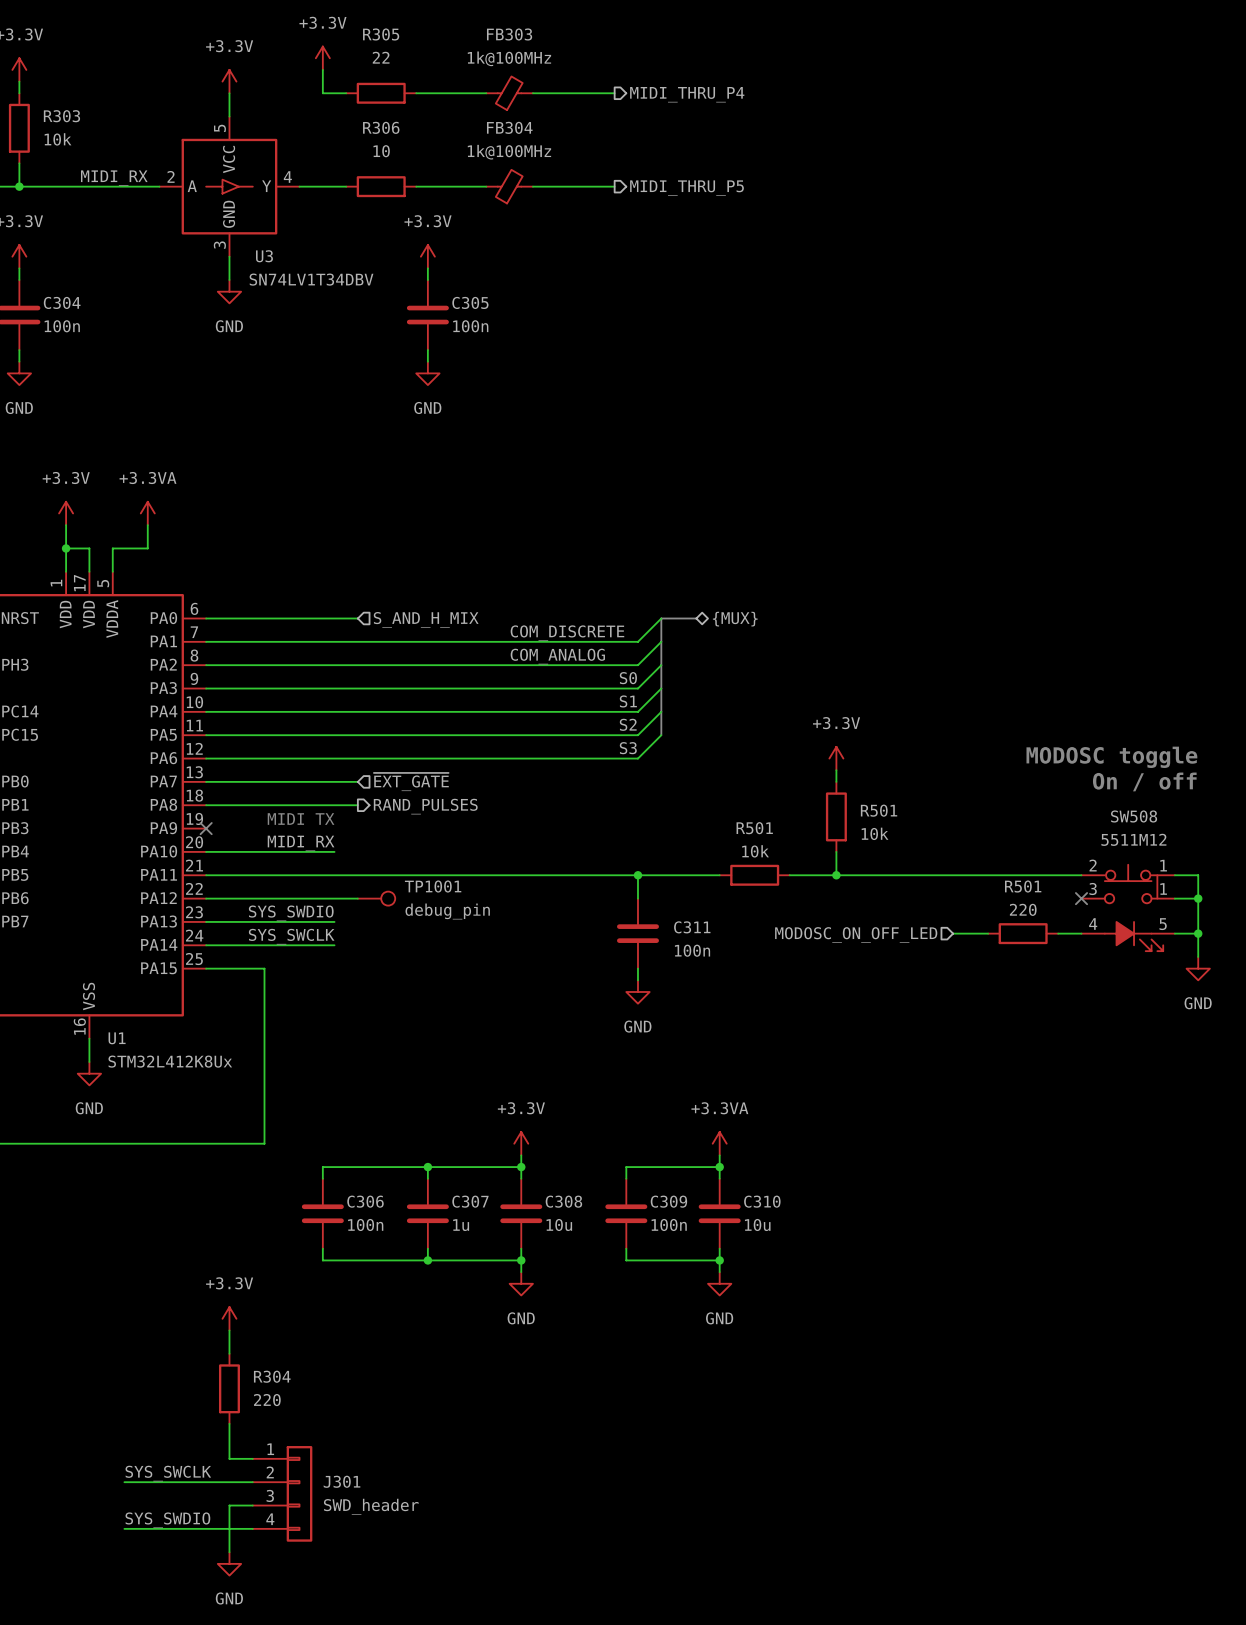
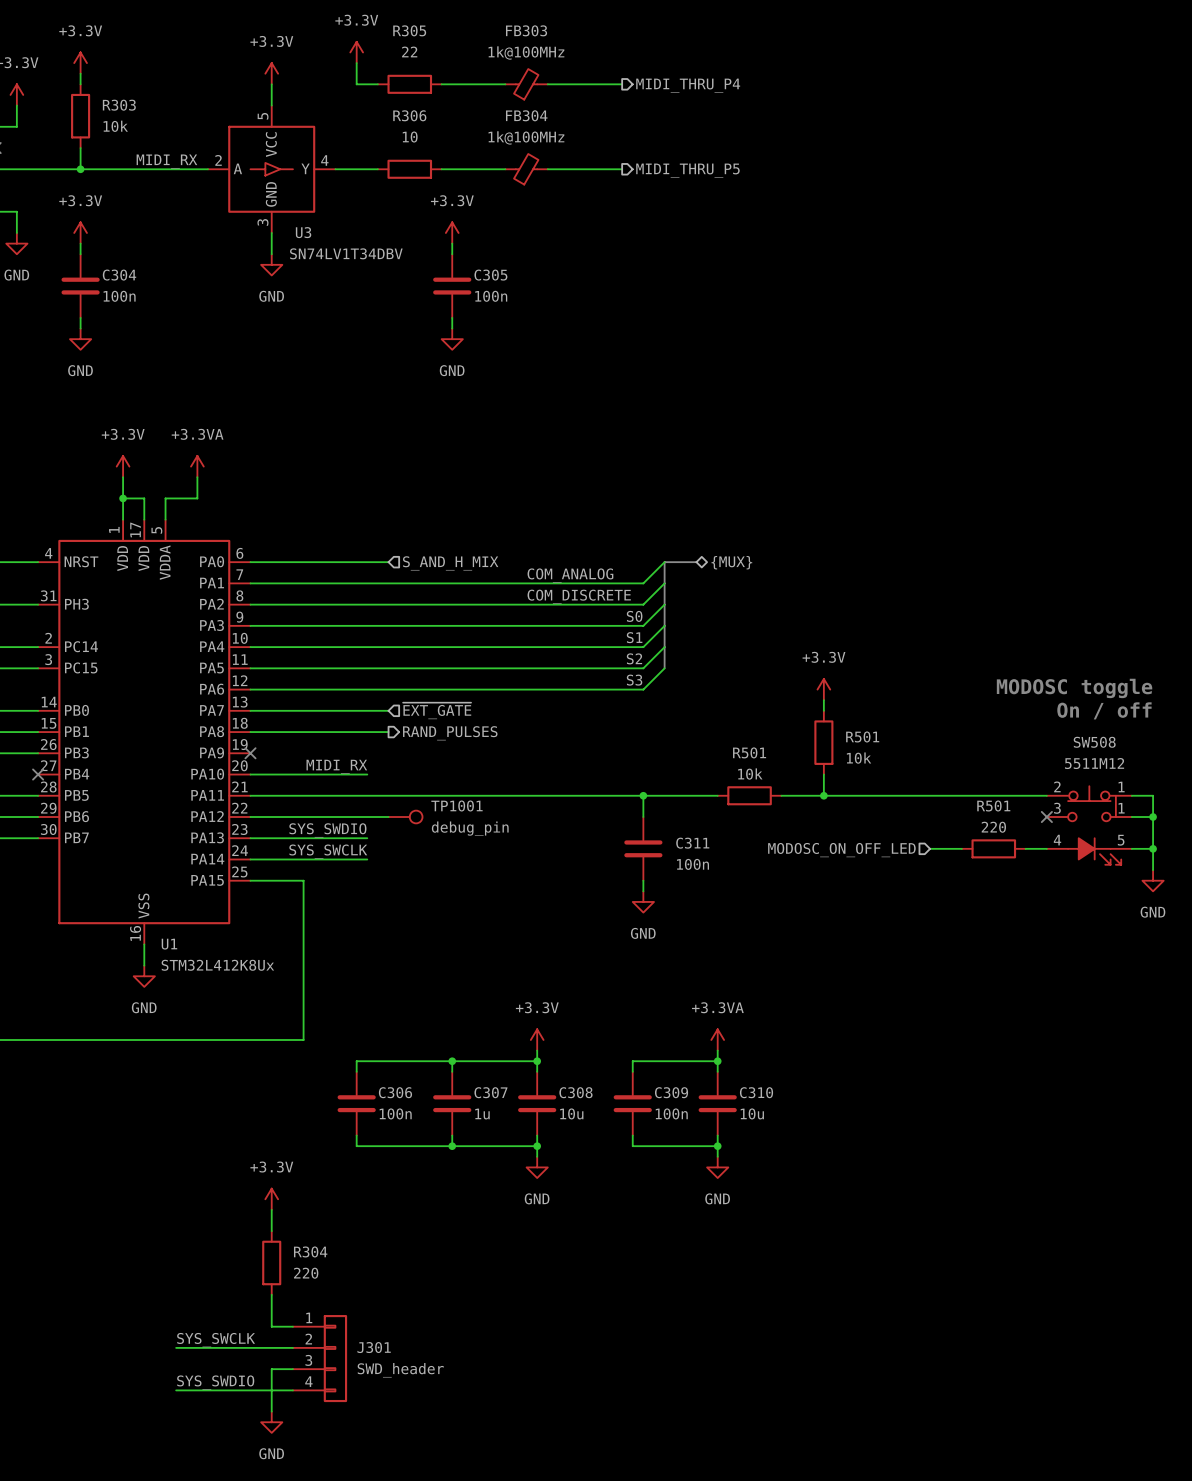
label: COM_DISCRETE (567, 633) -> COM_ANALOG (570, 575)
label: COM_ANALOG (557, 656) -> COM_DISCRETE (579, 596)
text: MIDI TX (301, 819) -> none

